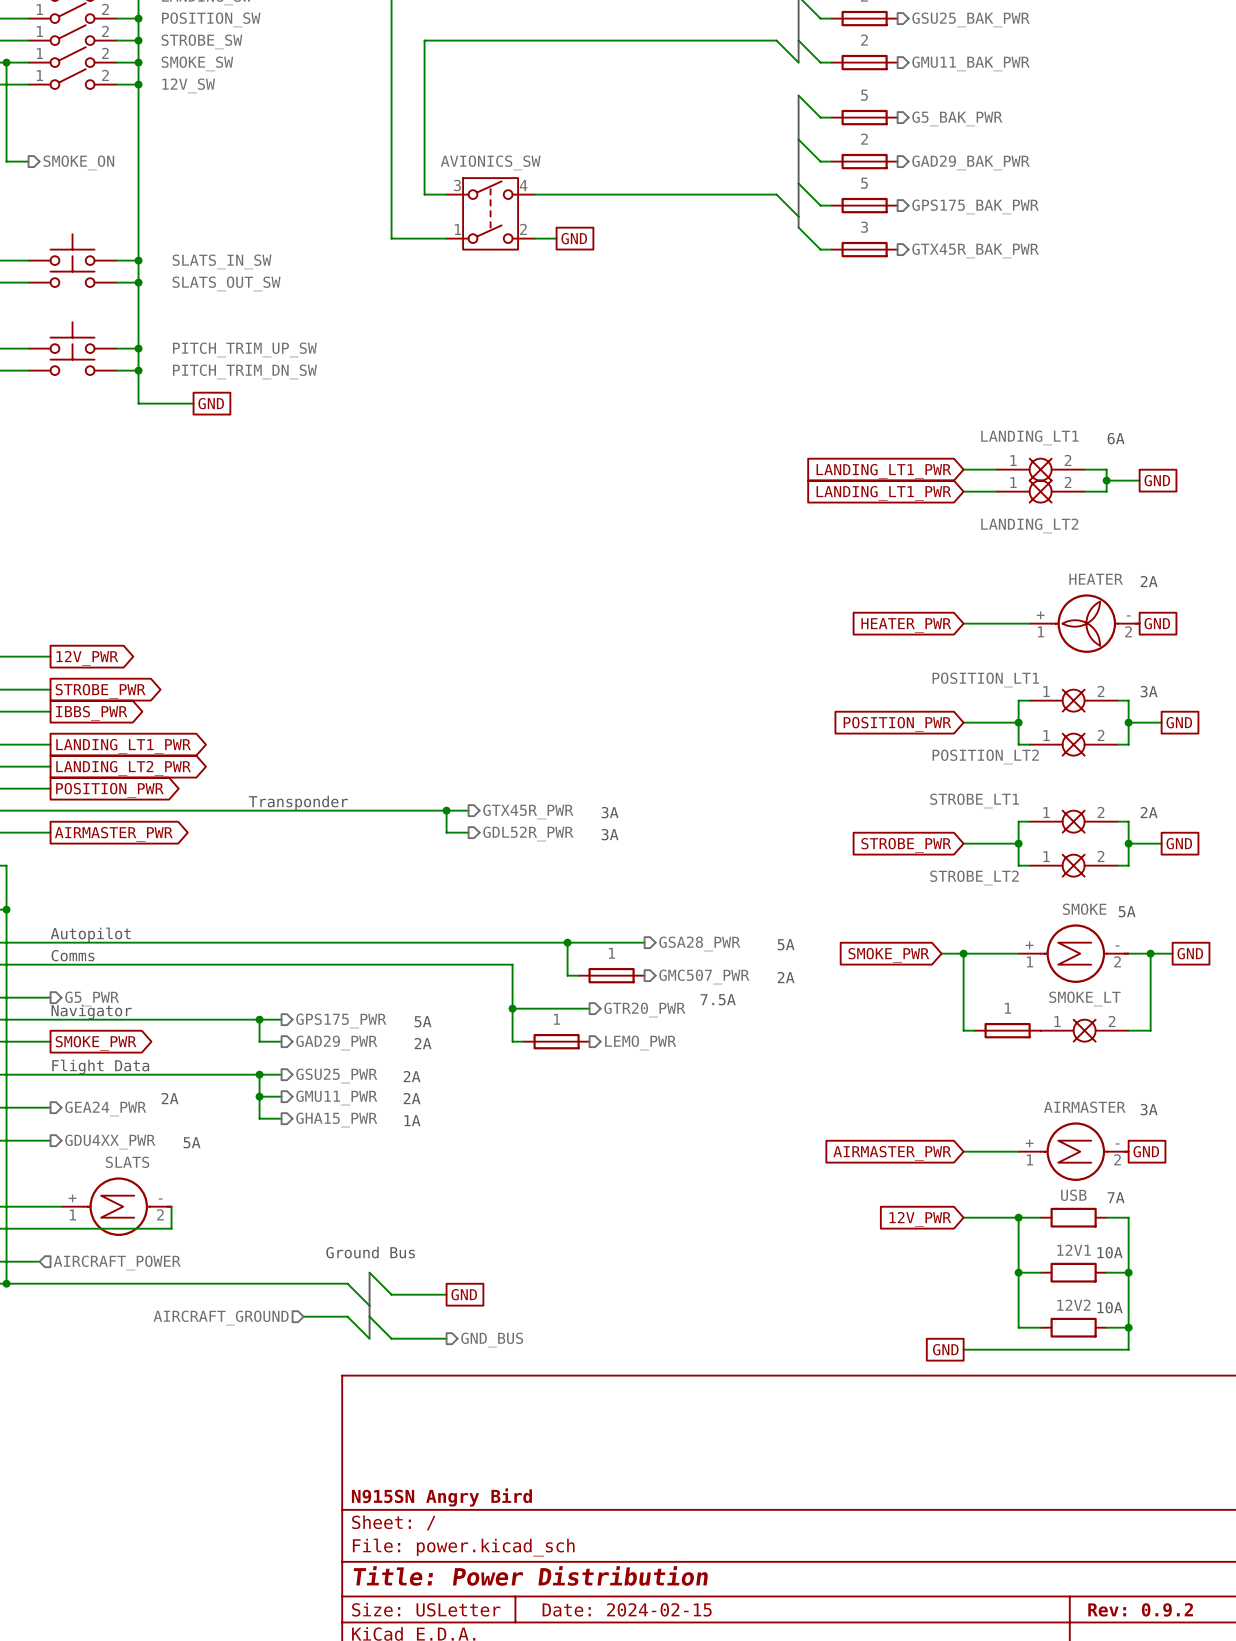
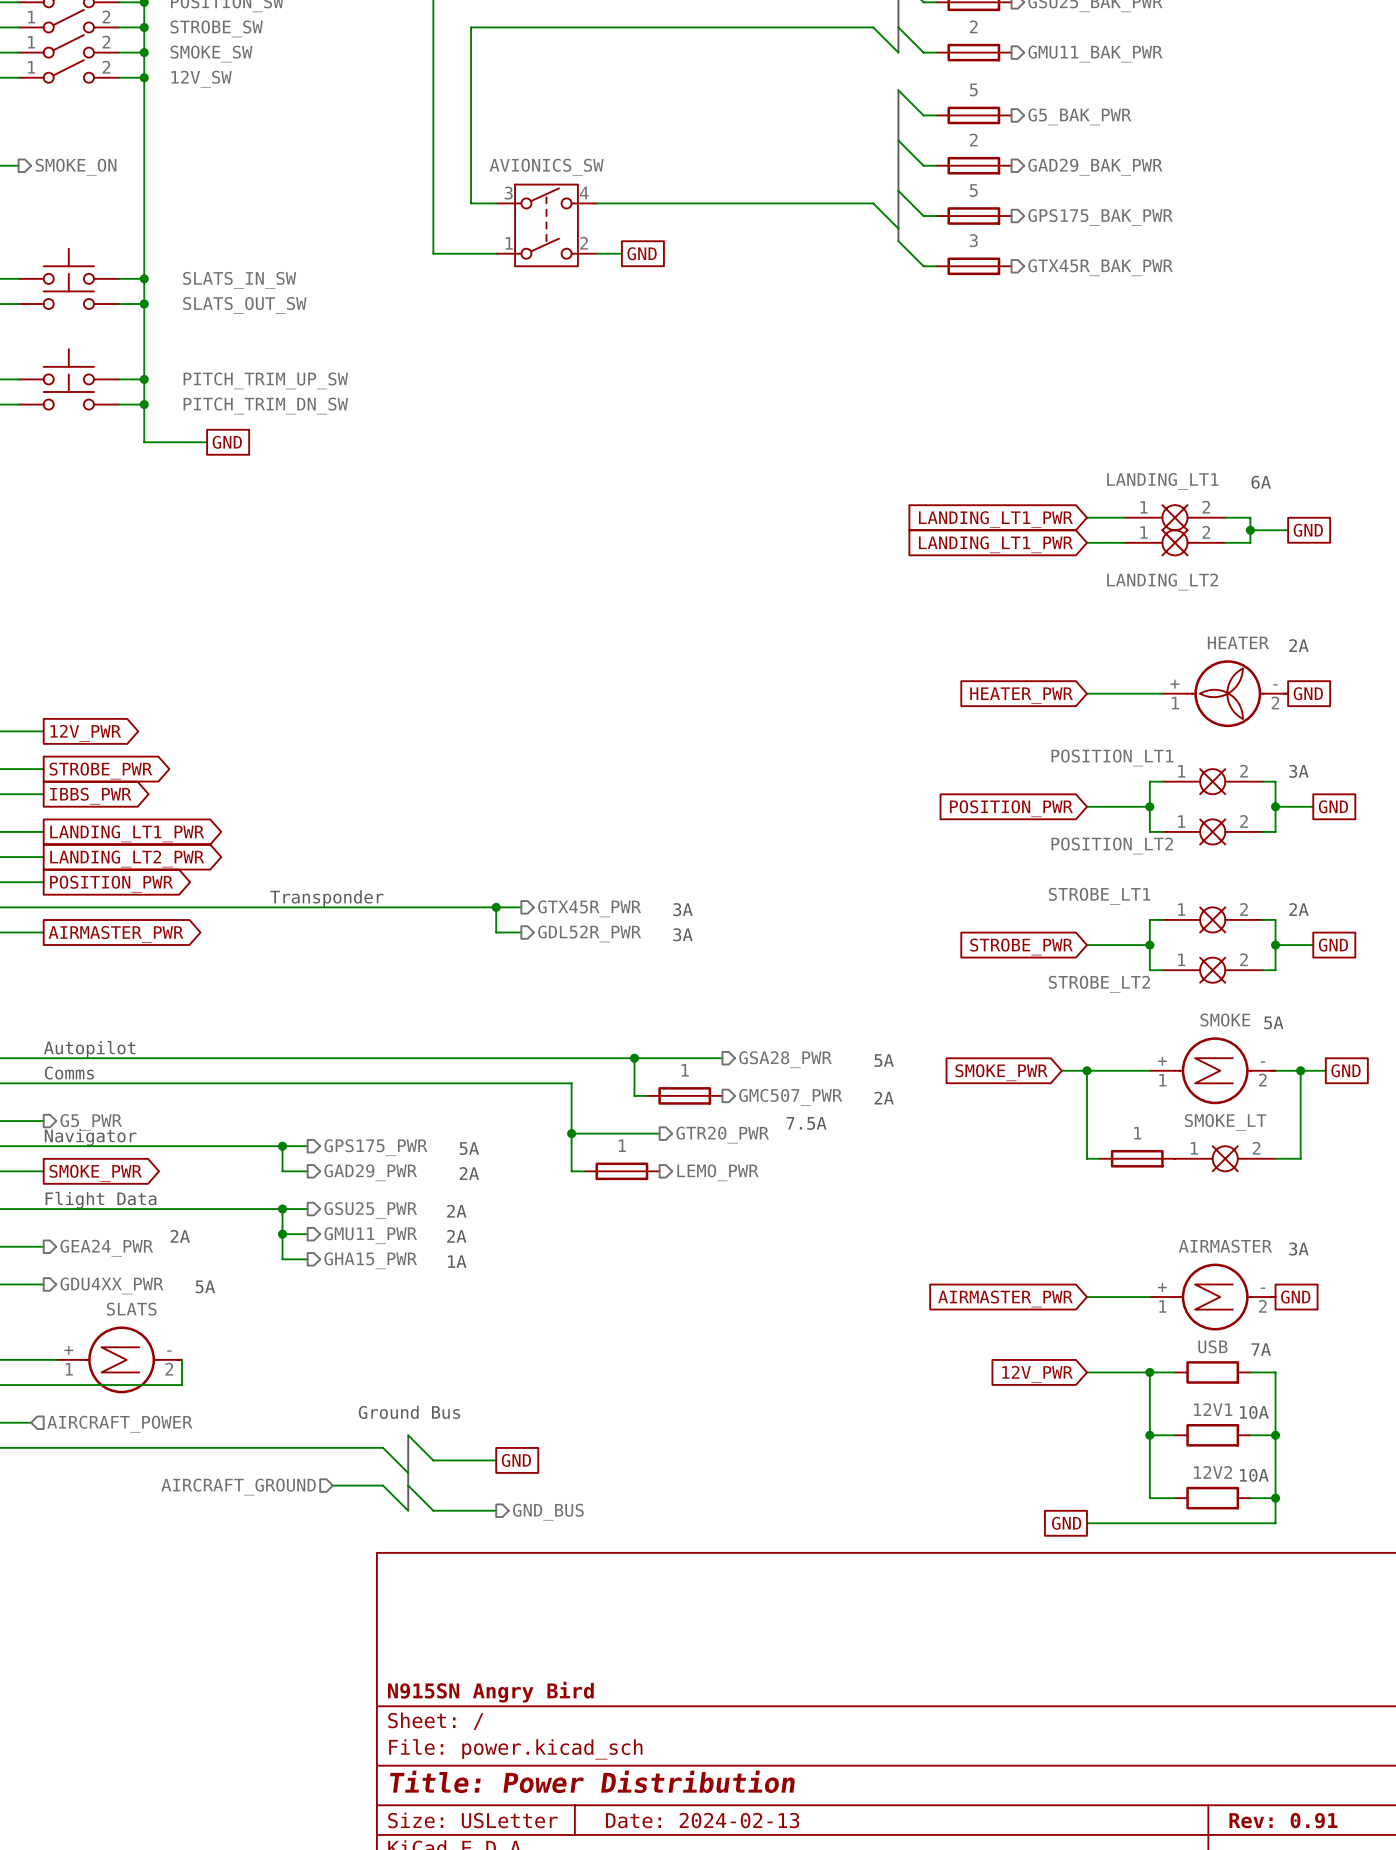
title block: Date: 2024-02-15 (627, 1609) -> Date: 2024-02-13 (702, 1820)
title block: Rev: 0.9.2 (1140, 1609) -> Rev: 0.91 (1283, 1820)

